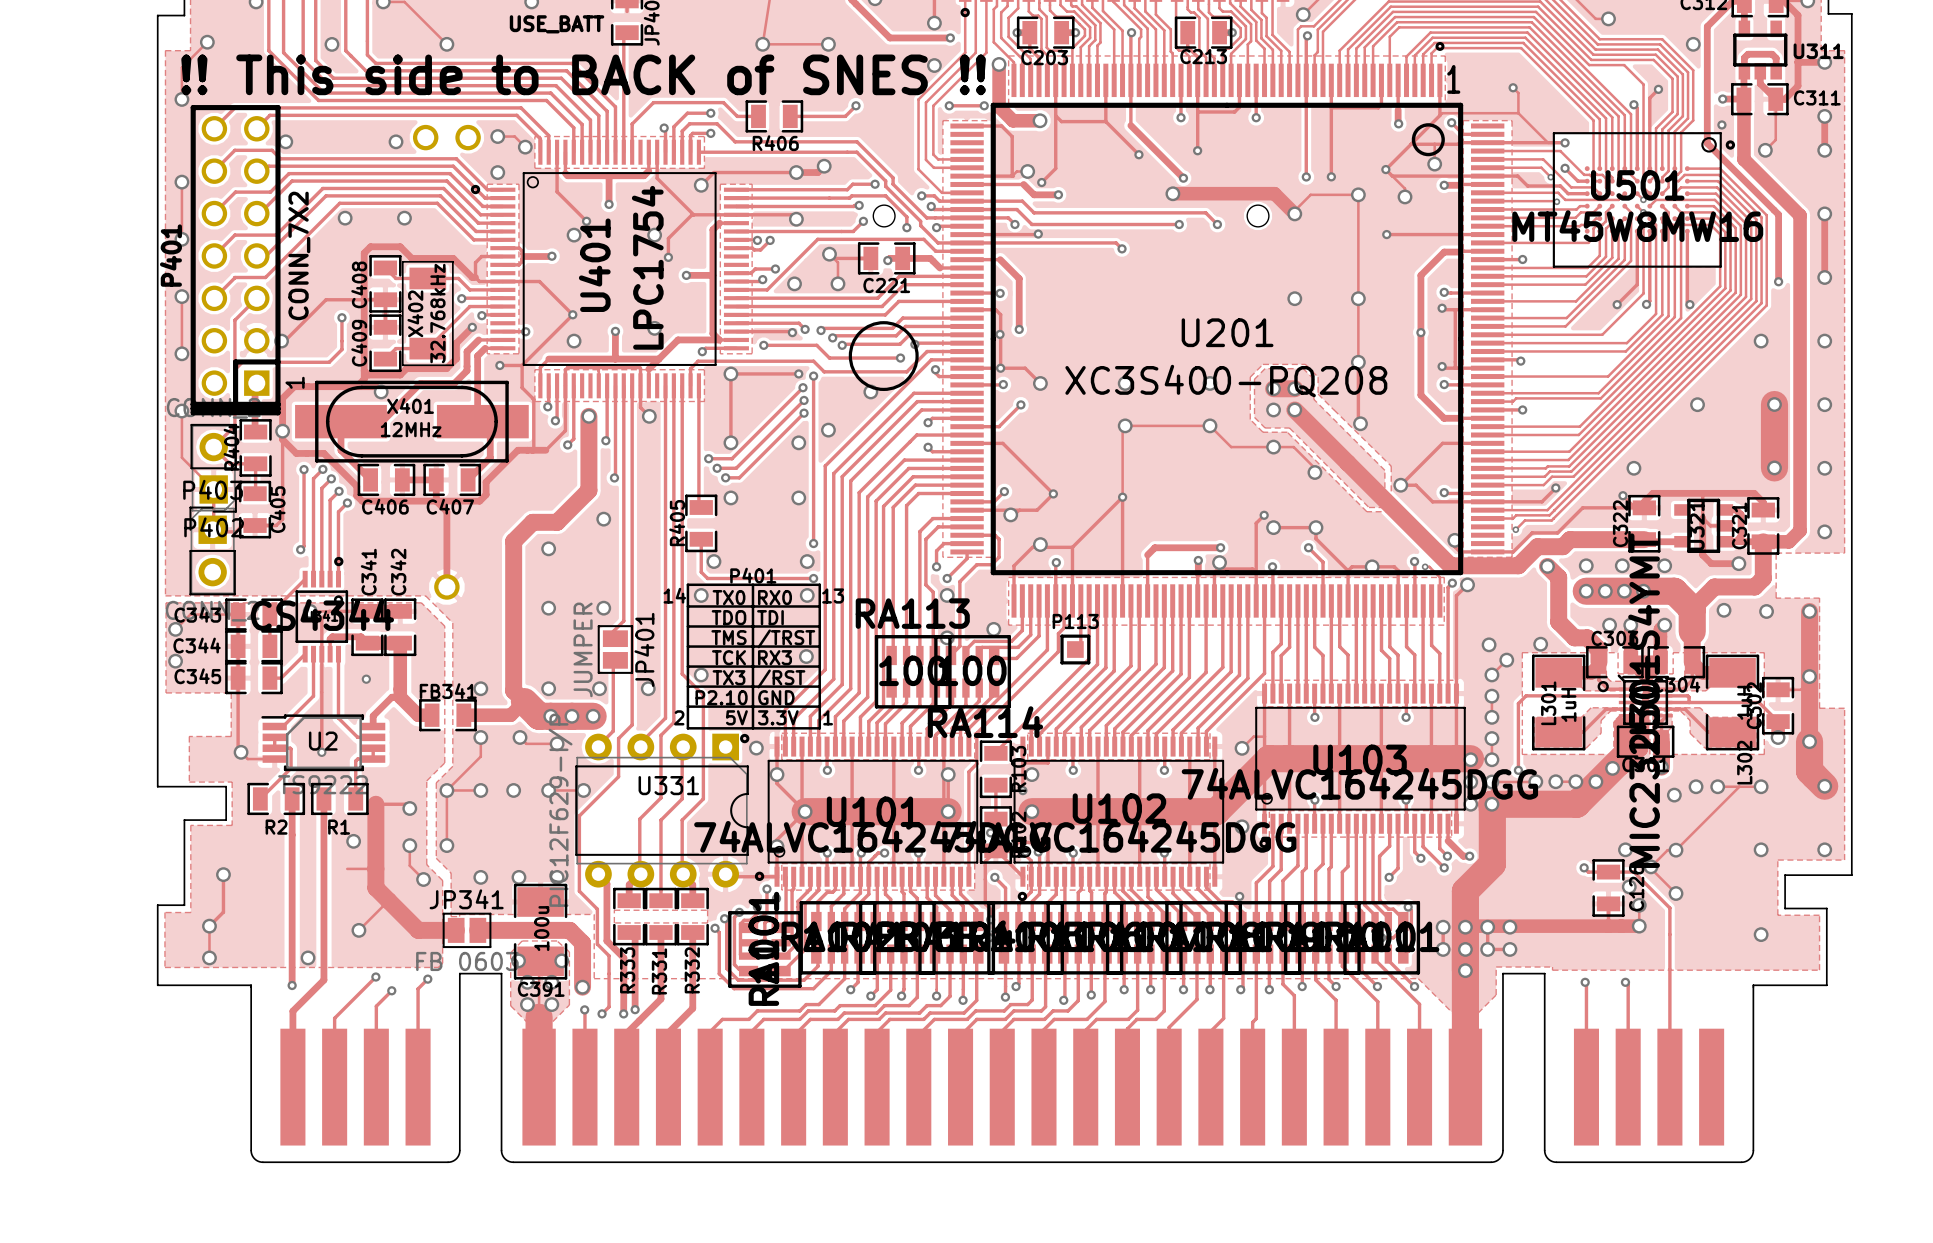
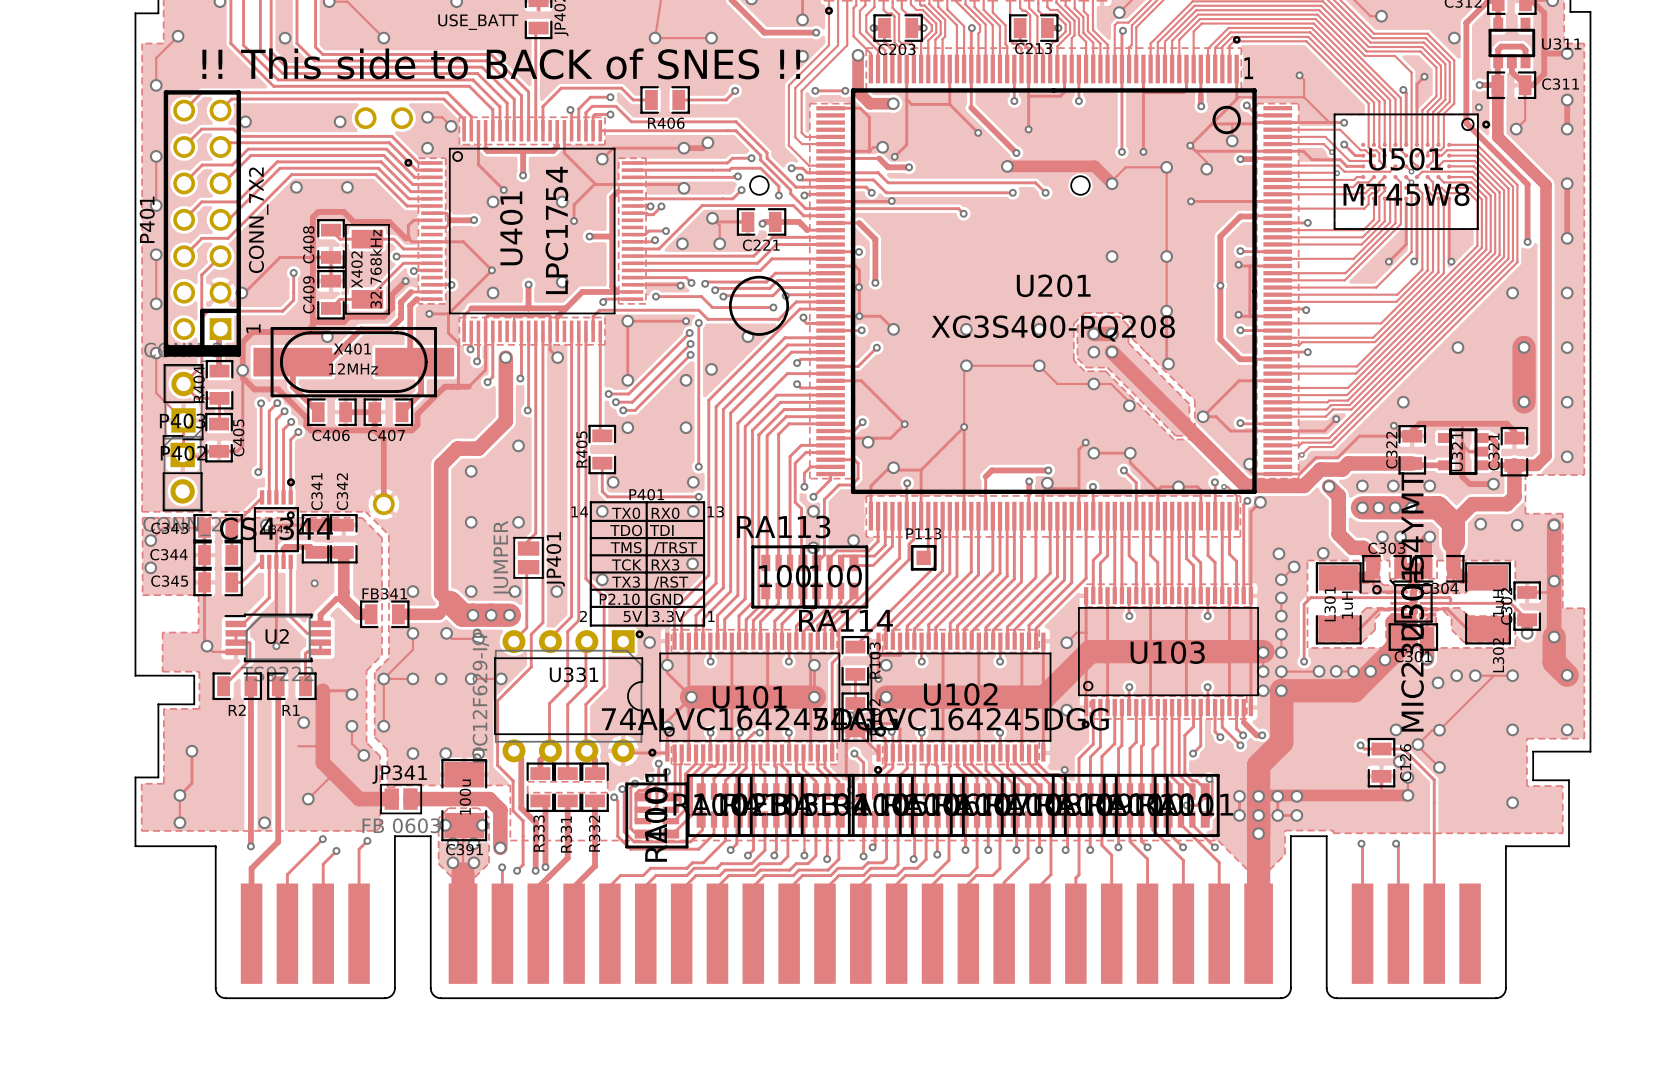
U501 value: MT45W8MW16 (1637, 226) -> MT45W8 (1406, 194)
U103 value: 74ALVC164245DGG (1359, 783) -> none

